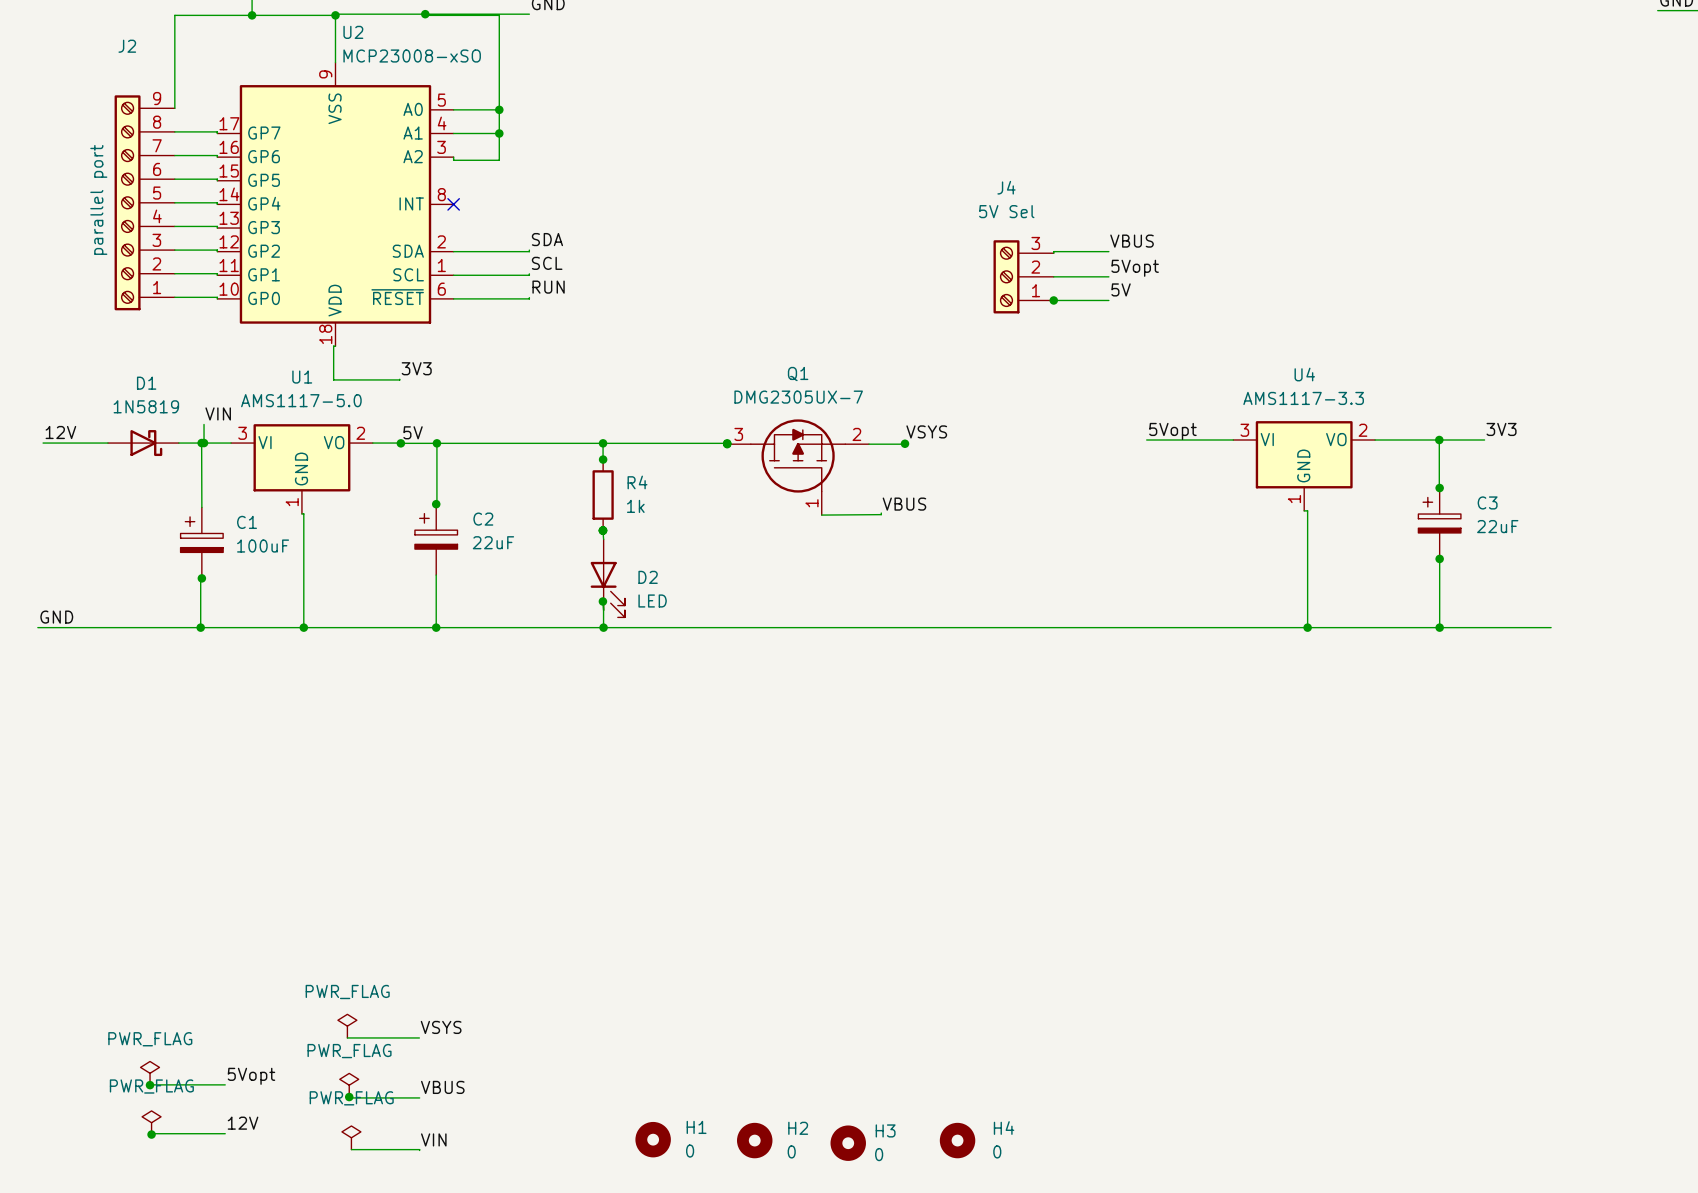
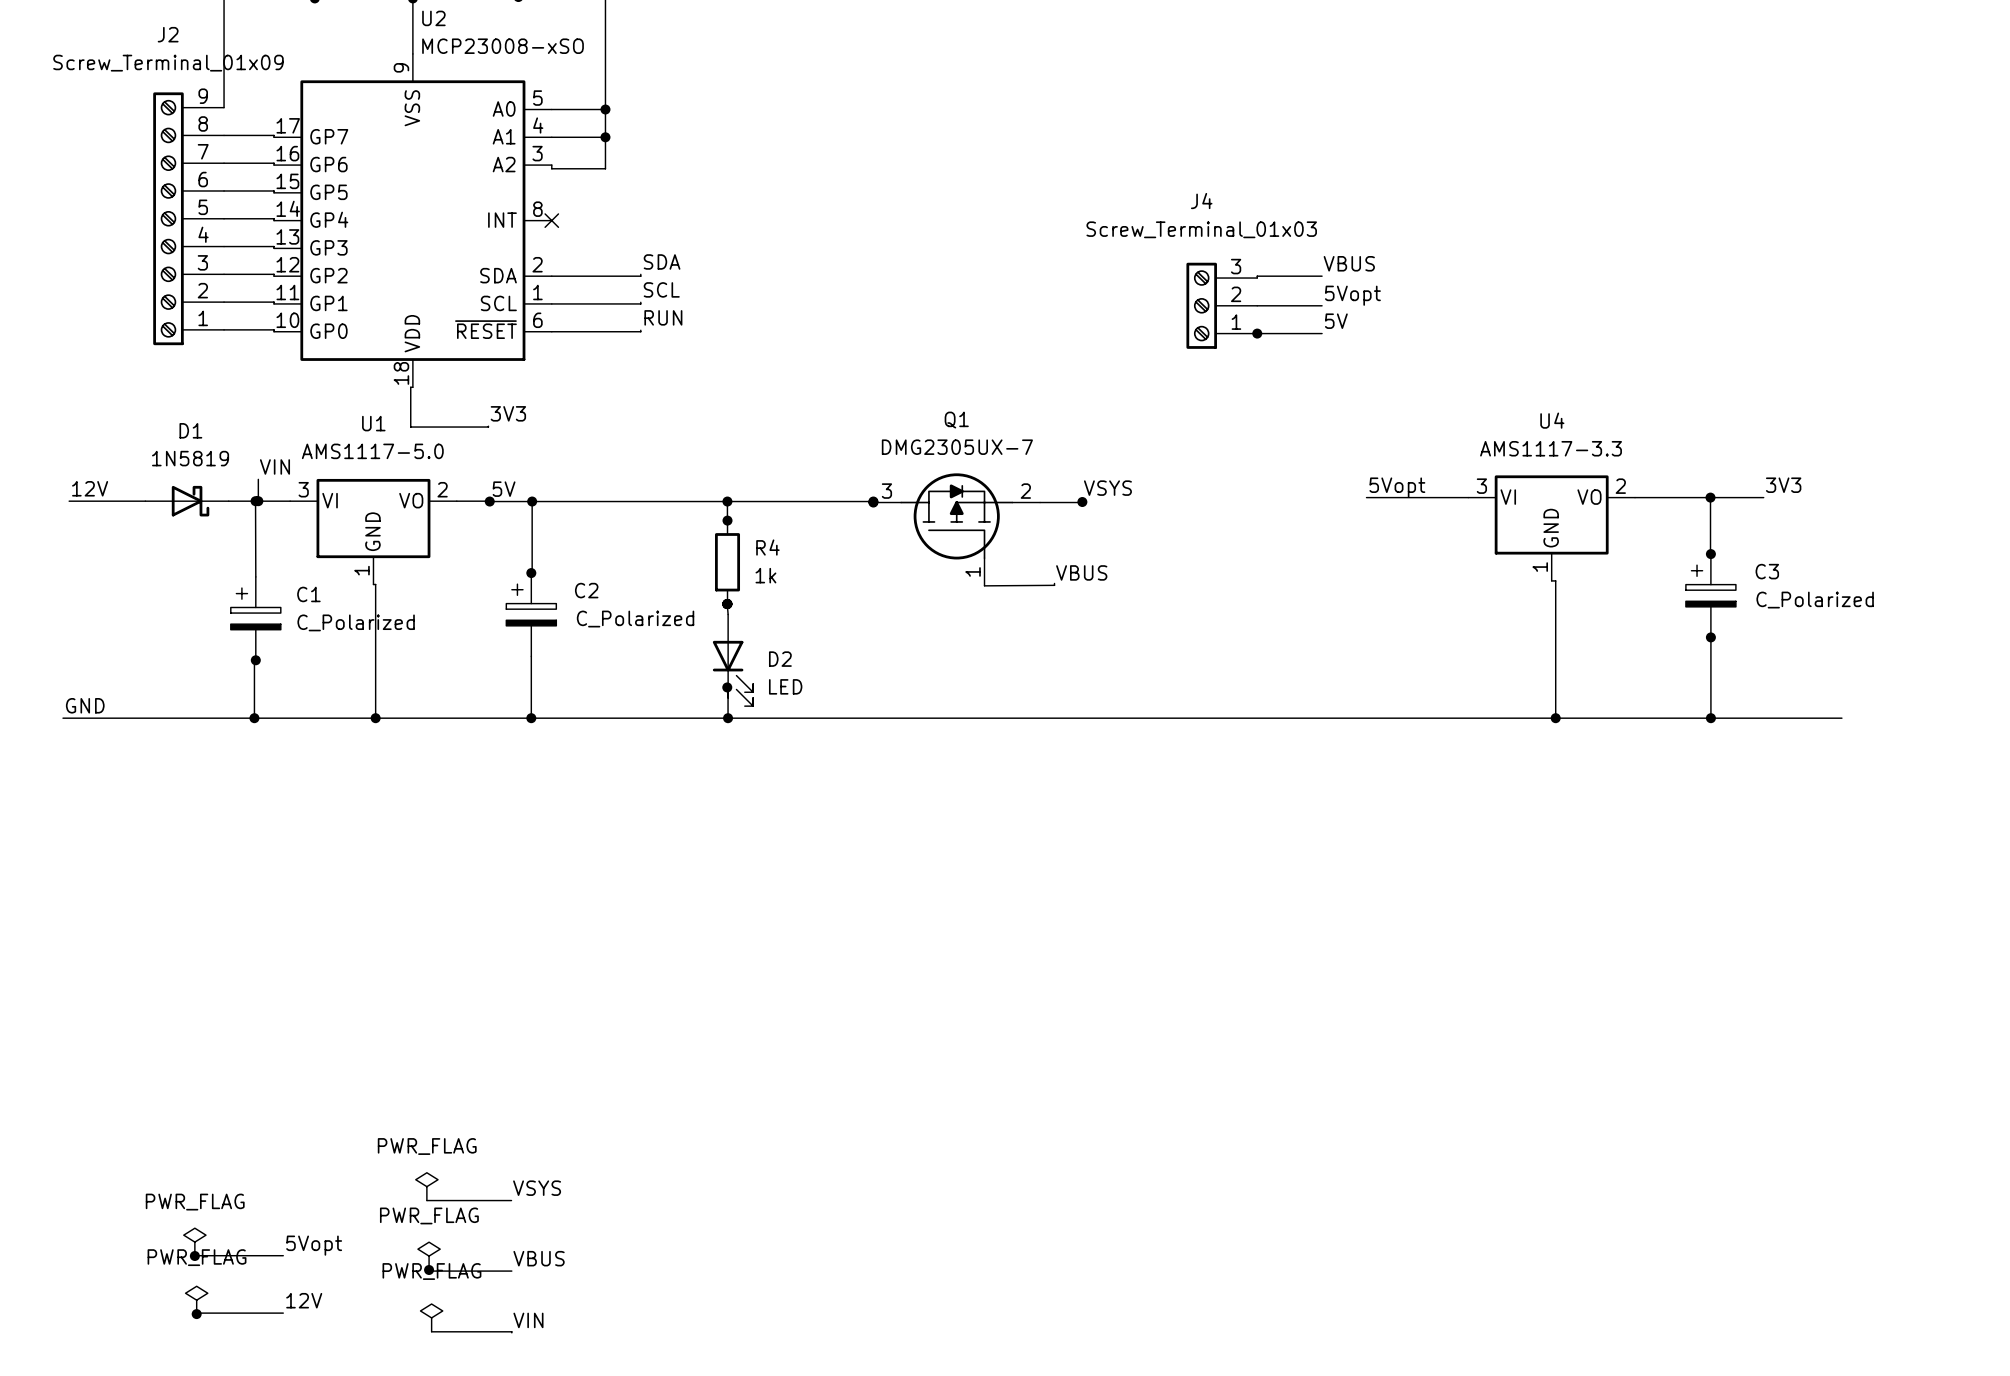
J2 value: parallel port (98, 199) -> Screw_Terminal_01x09 (168, 63)
J4 value: 5V Sel (1006, 211) -> Screw_Terminal_01x03 (1201, 229)
C3 value: 22uF (1497, 526) -> C_Polarized (1815, 600)
C2 value: 22uF (493, 542) -> C_Polarized (635, 619)
C1 value: 100uF (263, 546) -> C_Polarized (356, 622)
H1: 0 (653, 1139) -> none
H2: 0 (754, 1140) -> none
H4: 0 (957, 1140) -> none
H3: 0 (848, 1143) -> none

